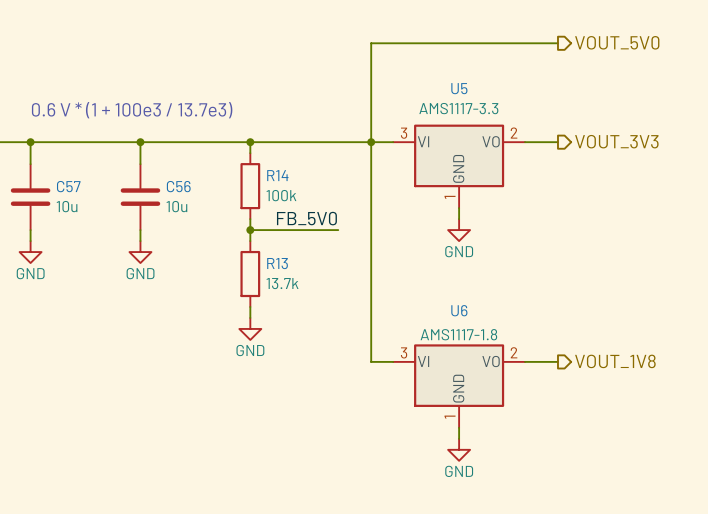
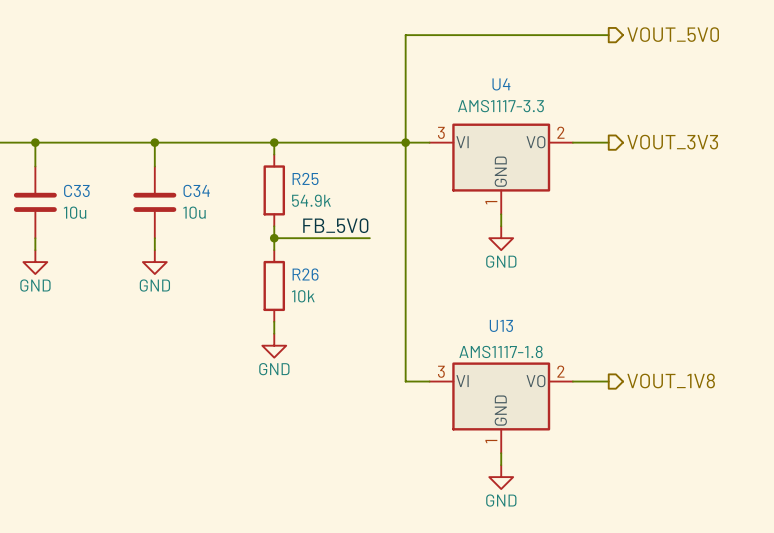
U5 name: U5 (459, 88) -> U4 (501, 84)
text: 0.6 V * (1 + 100e3 / 13.7e3) (132, 110) -> none
R14 name: R14 (277, 175) -> R25 (305, 178)
C57 name: C57 (68, 186) -> C33 (76, 190)
C56 name: C56 (178, 186) -> C34 (196, 190)
R14 value: 100k (281, 195) -> 54.9k (311, 200)
R13 name: R13 (277, 263) -> R26 (305, 274)
R13 value: 13.7k (282, 283) -> 10k (303, 296)
U6 name: U6 (459, 310) -> U13 (501, 325)

